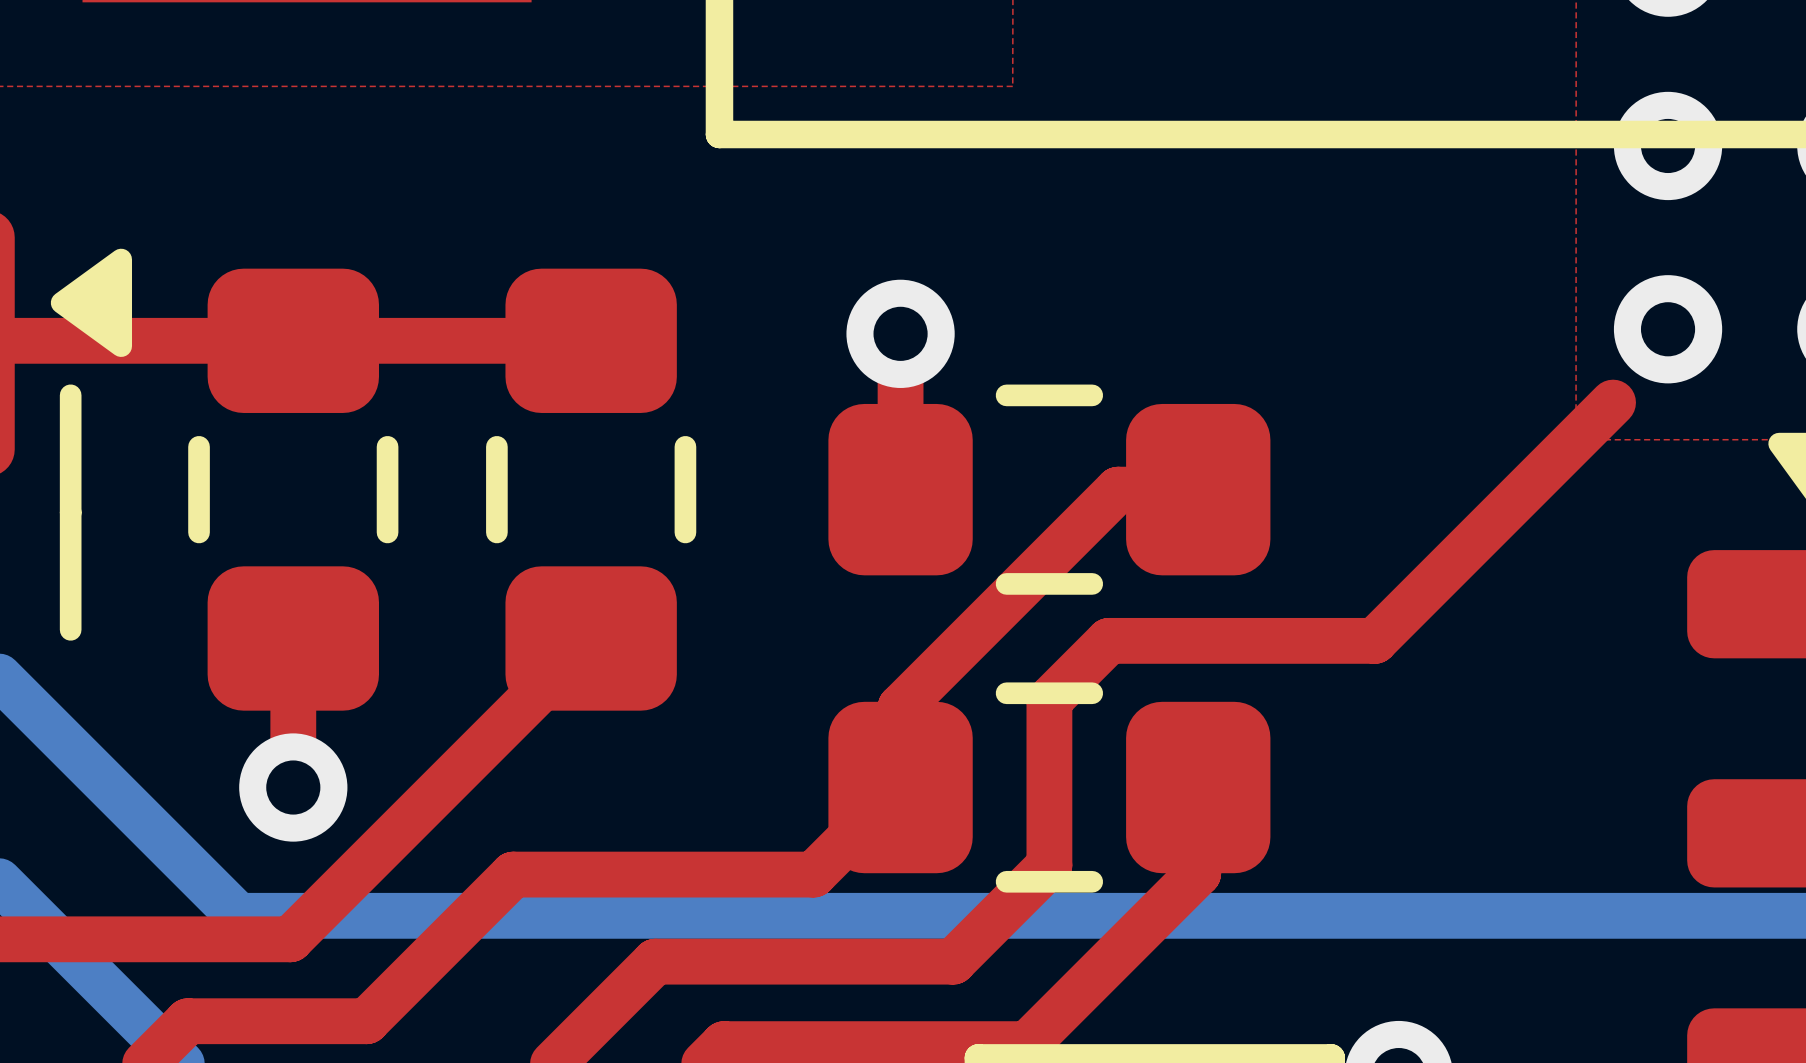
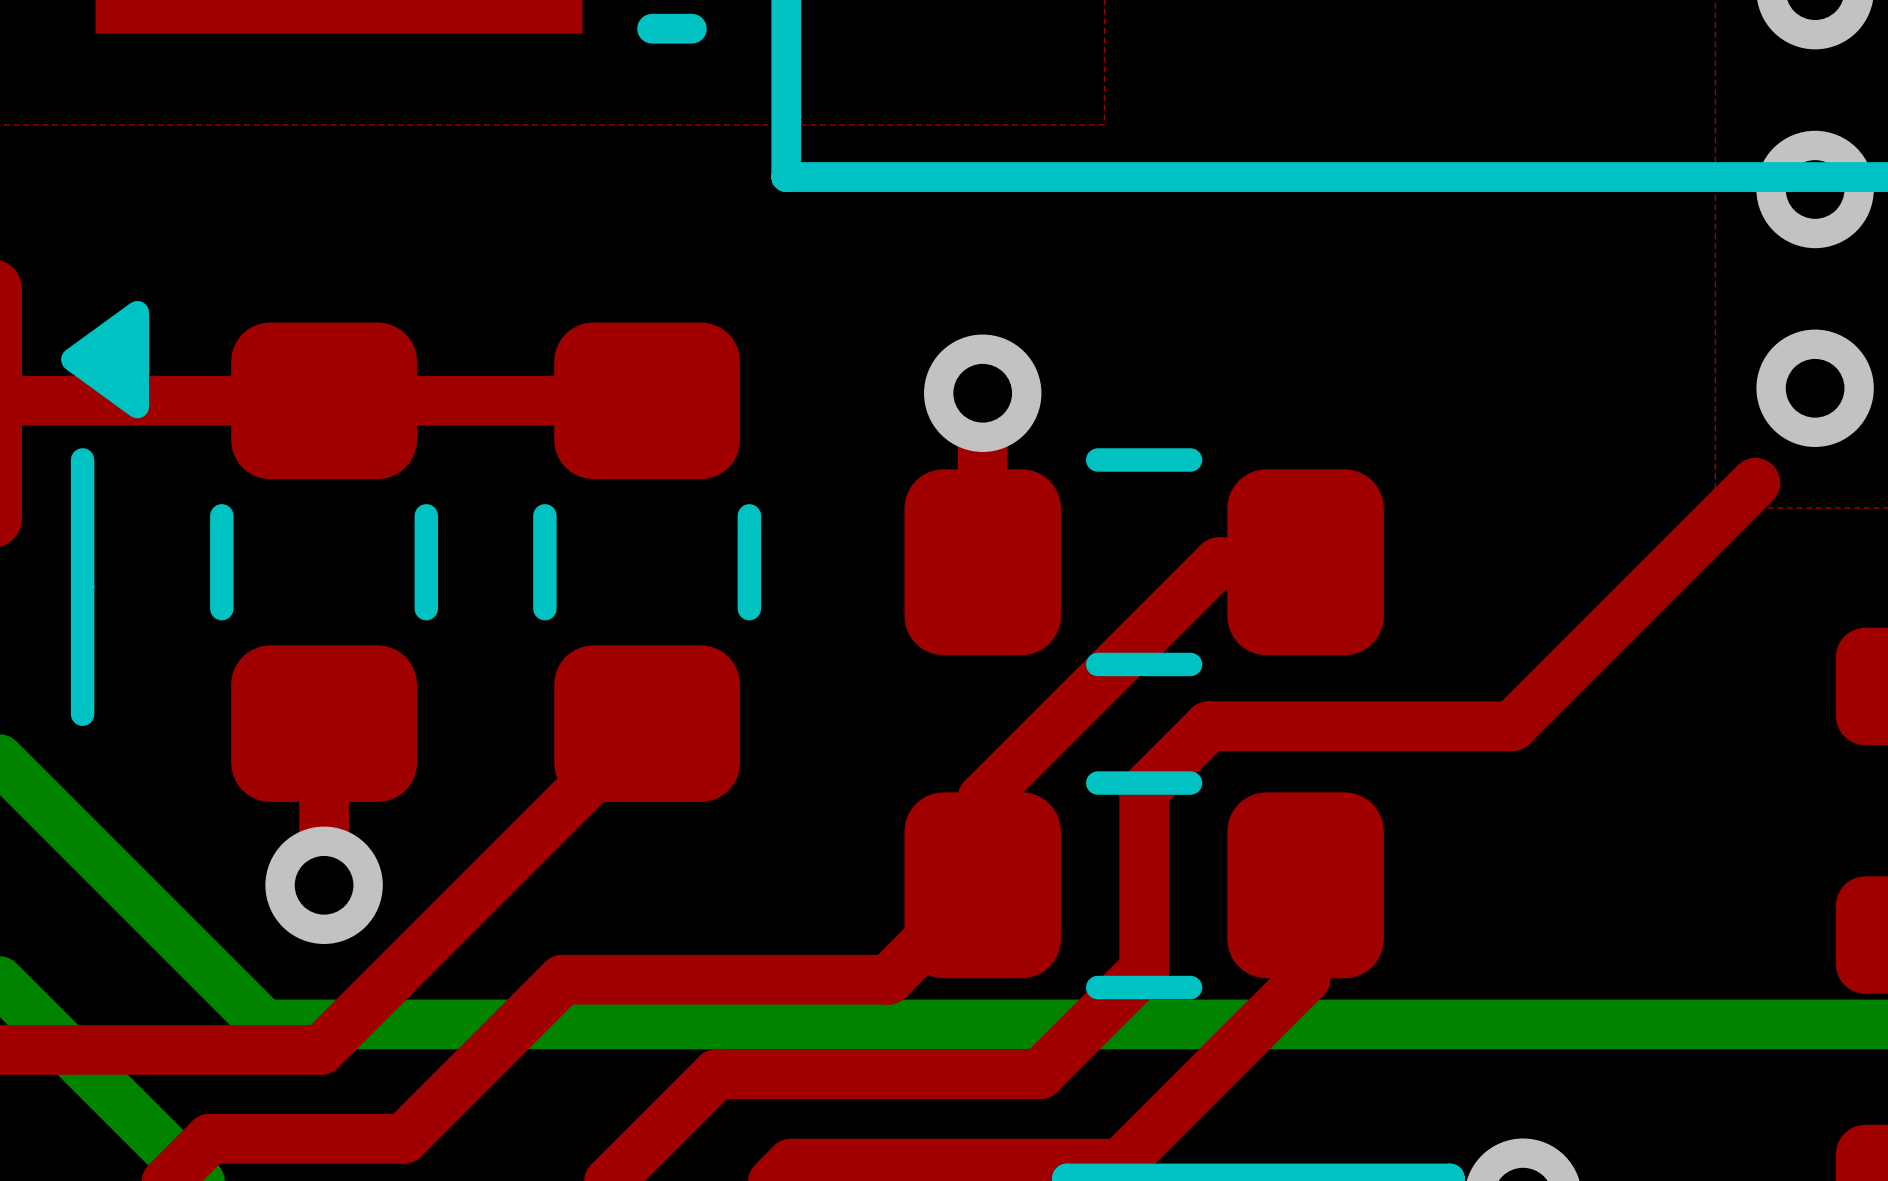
top track: (1613, 402) (1374, 640) -> (1755, 482) (1511, 726) (1497, 726)

